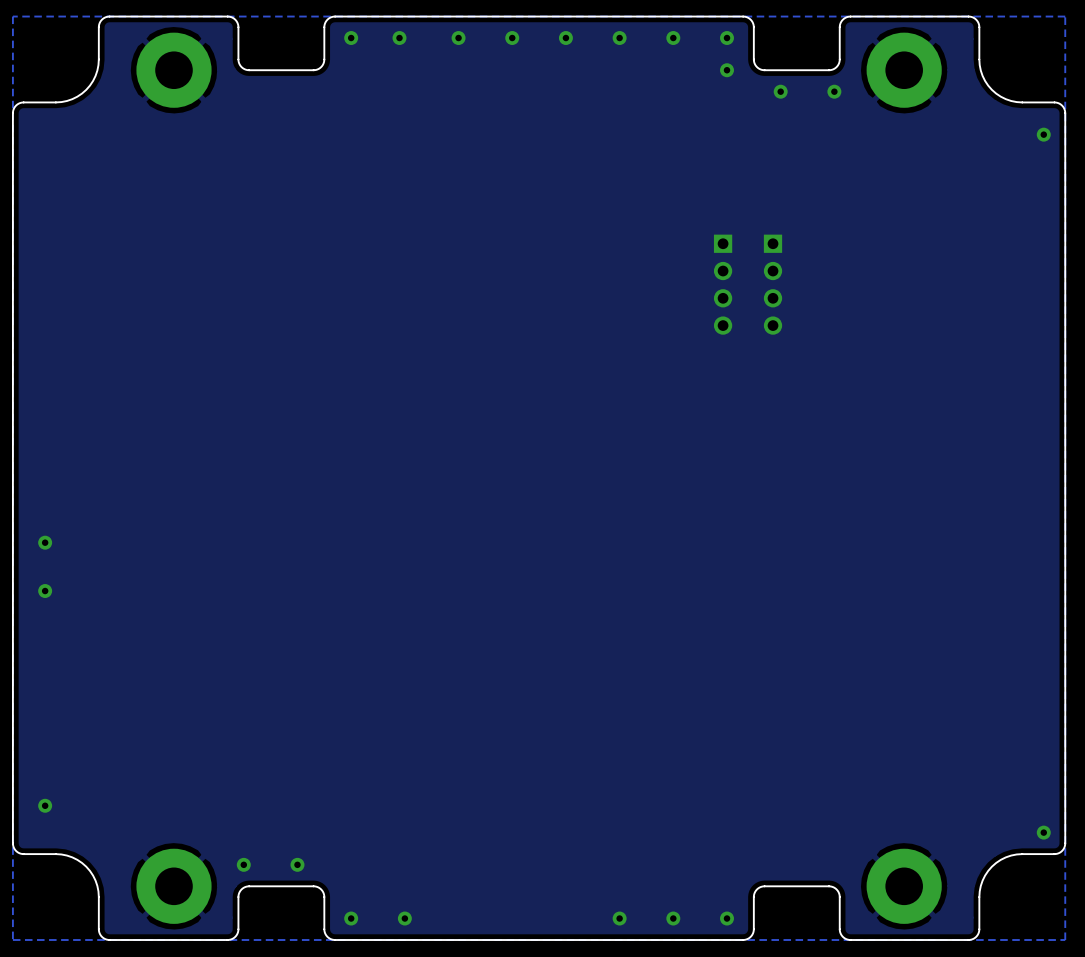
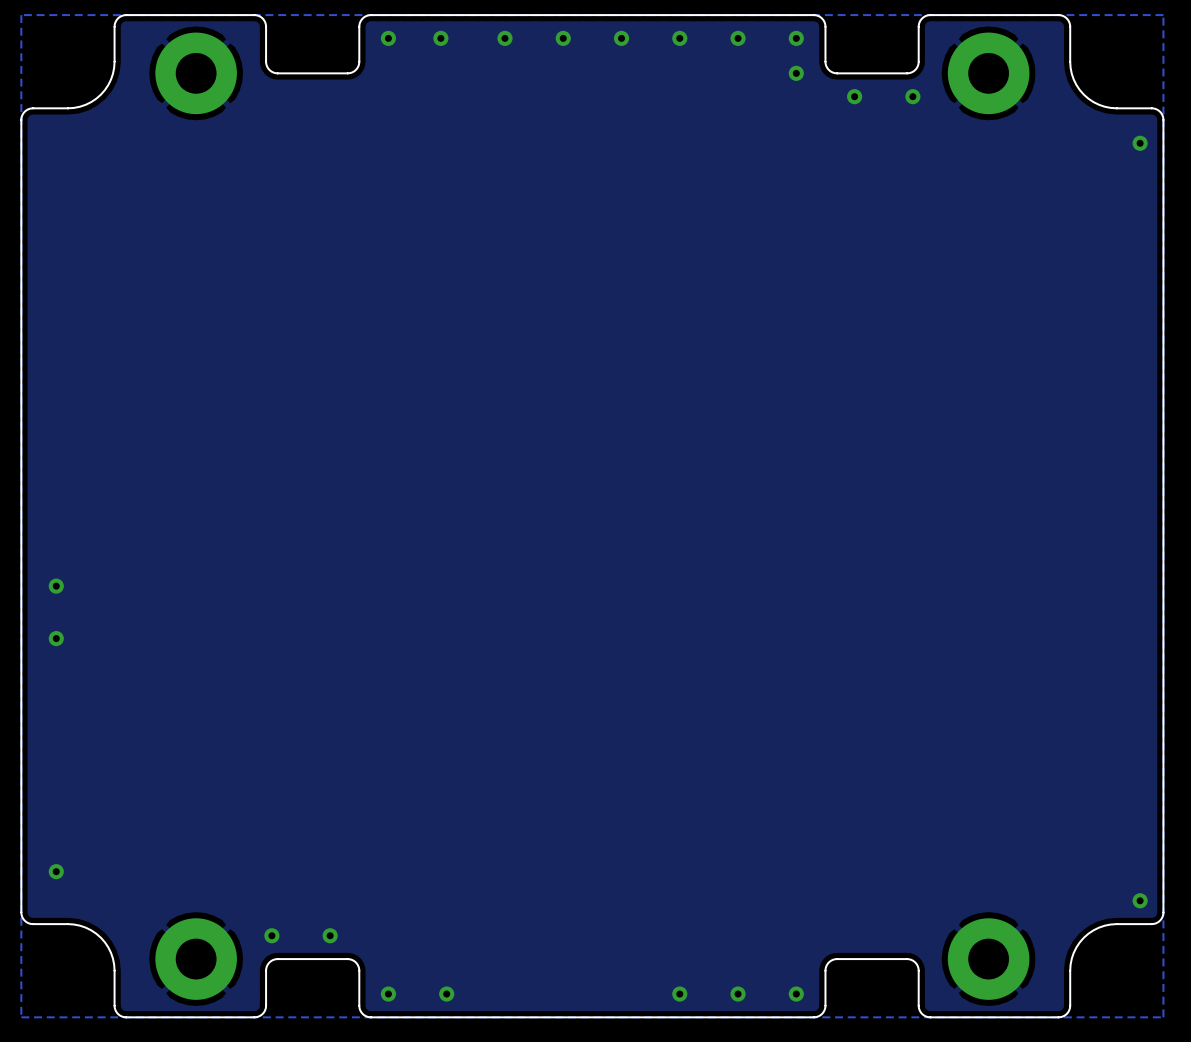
part: (723, 284) -> none
part: (773, 284) -> none

